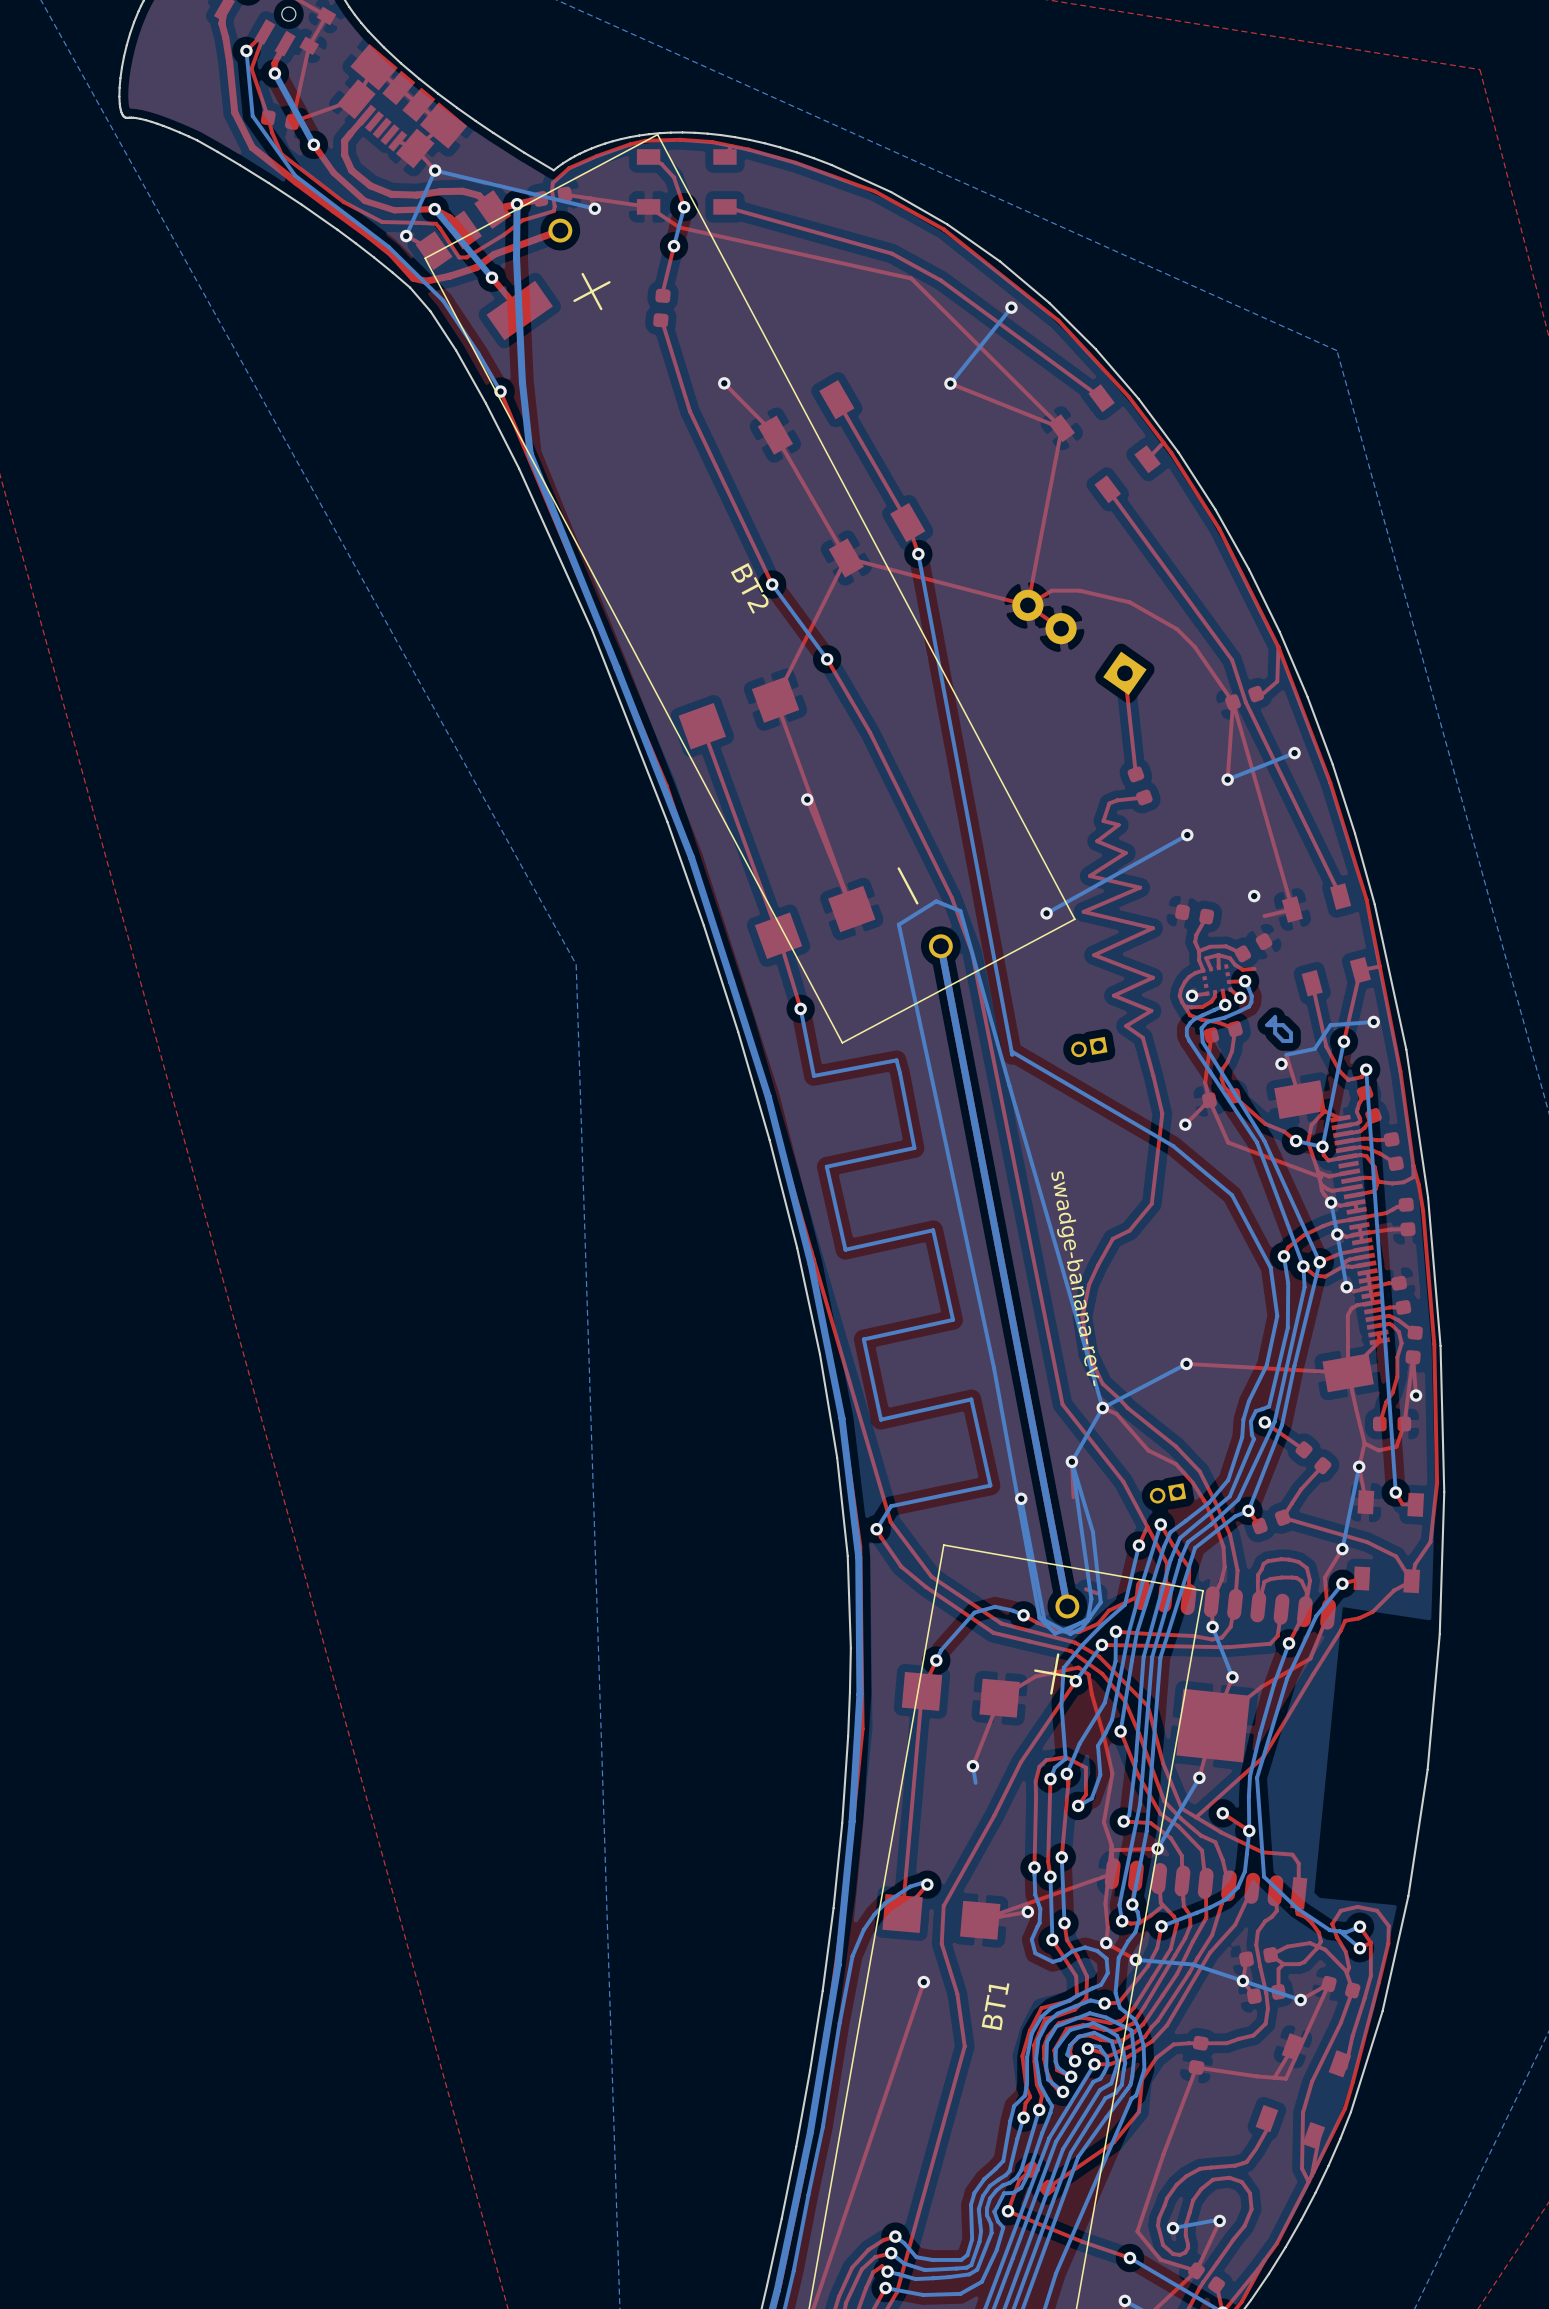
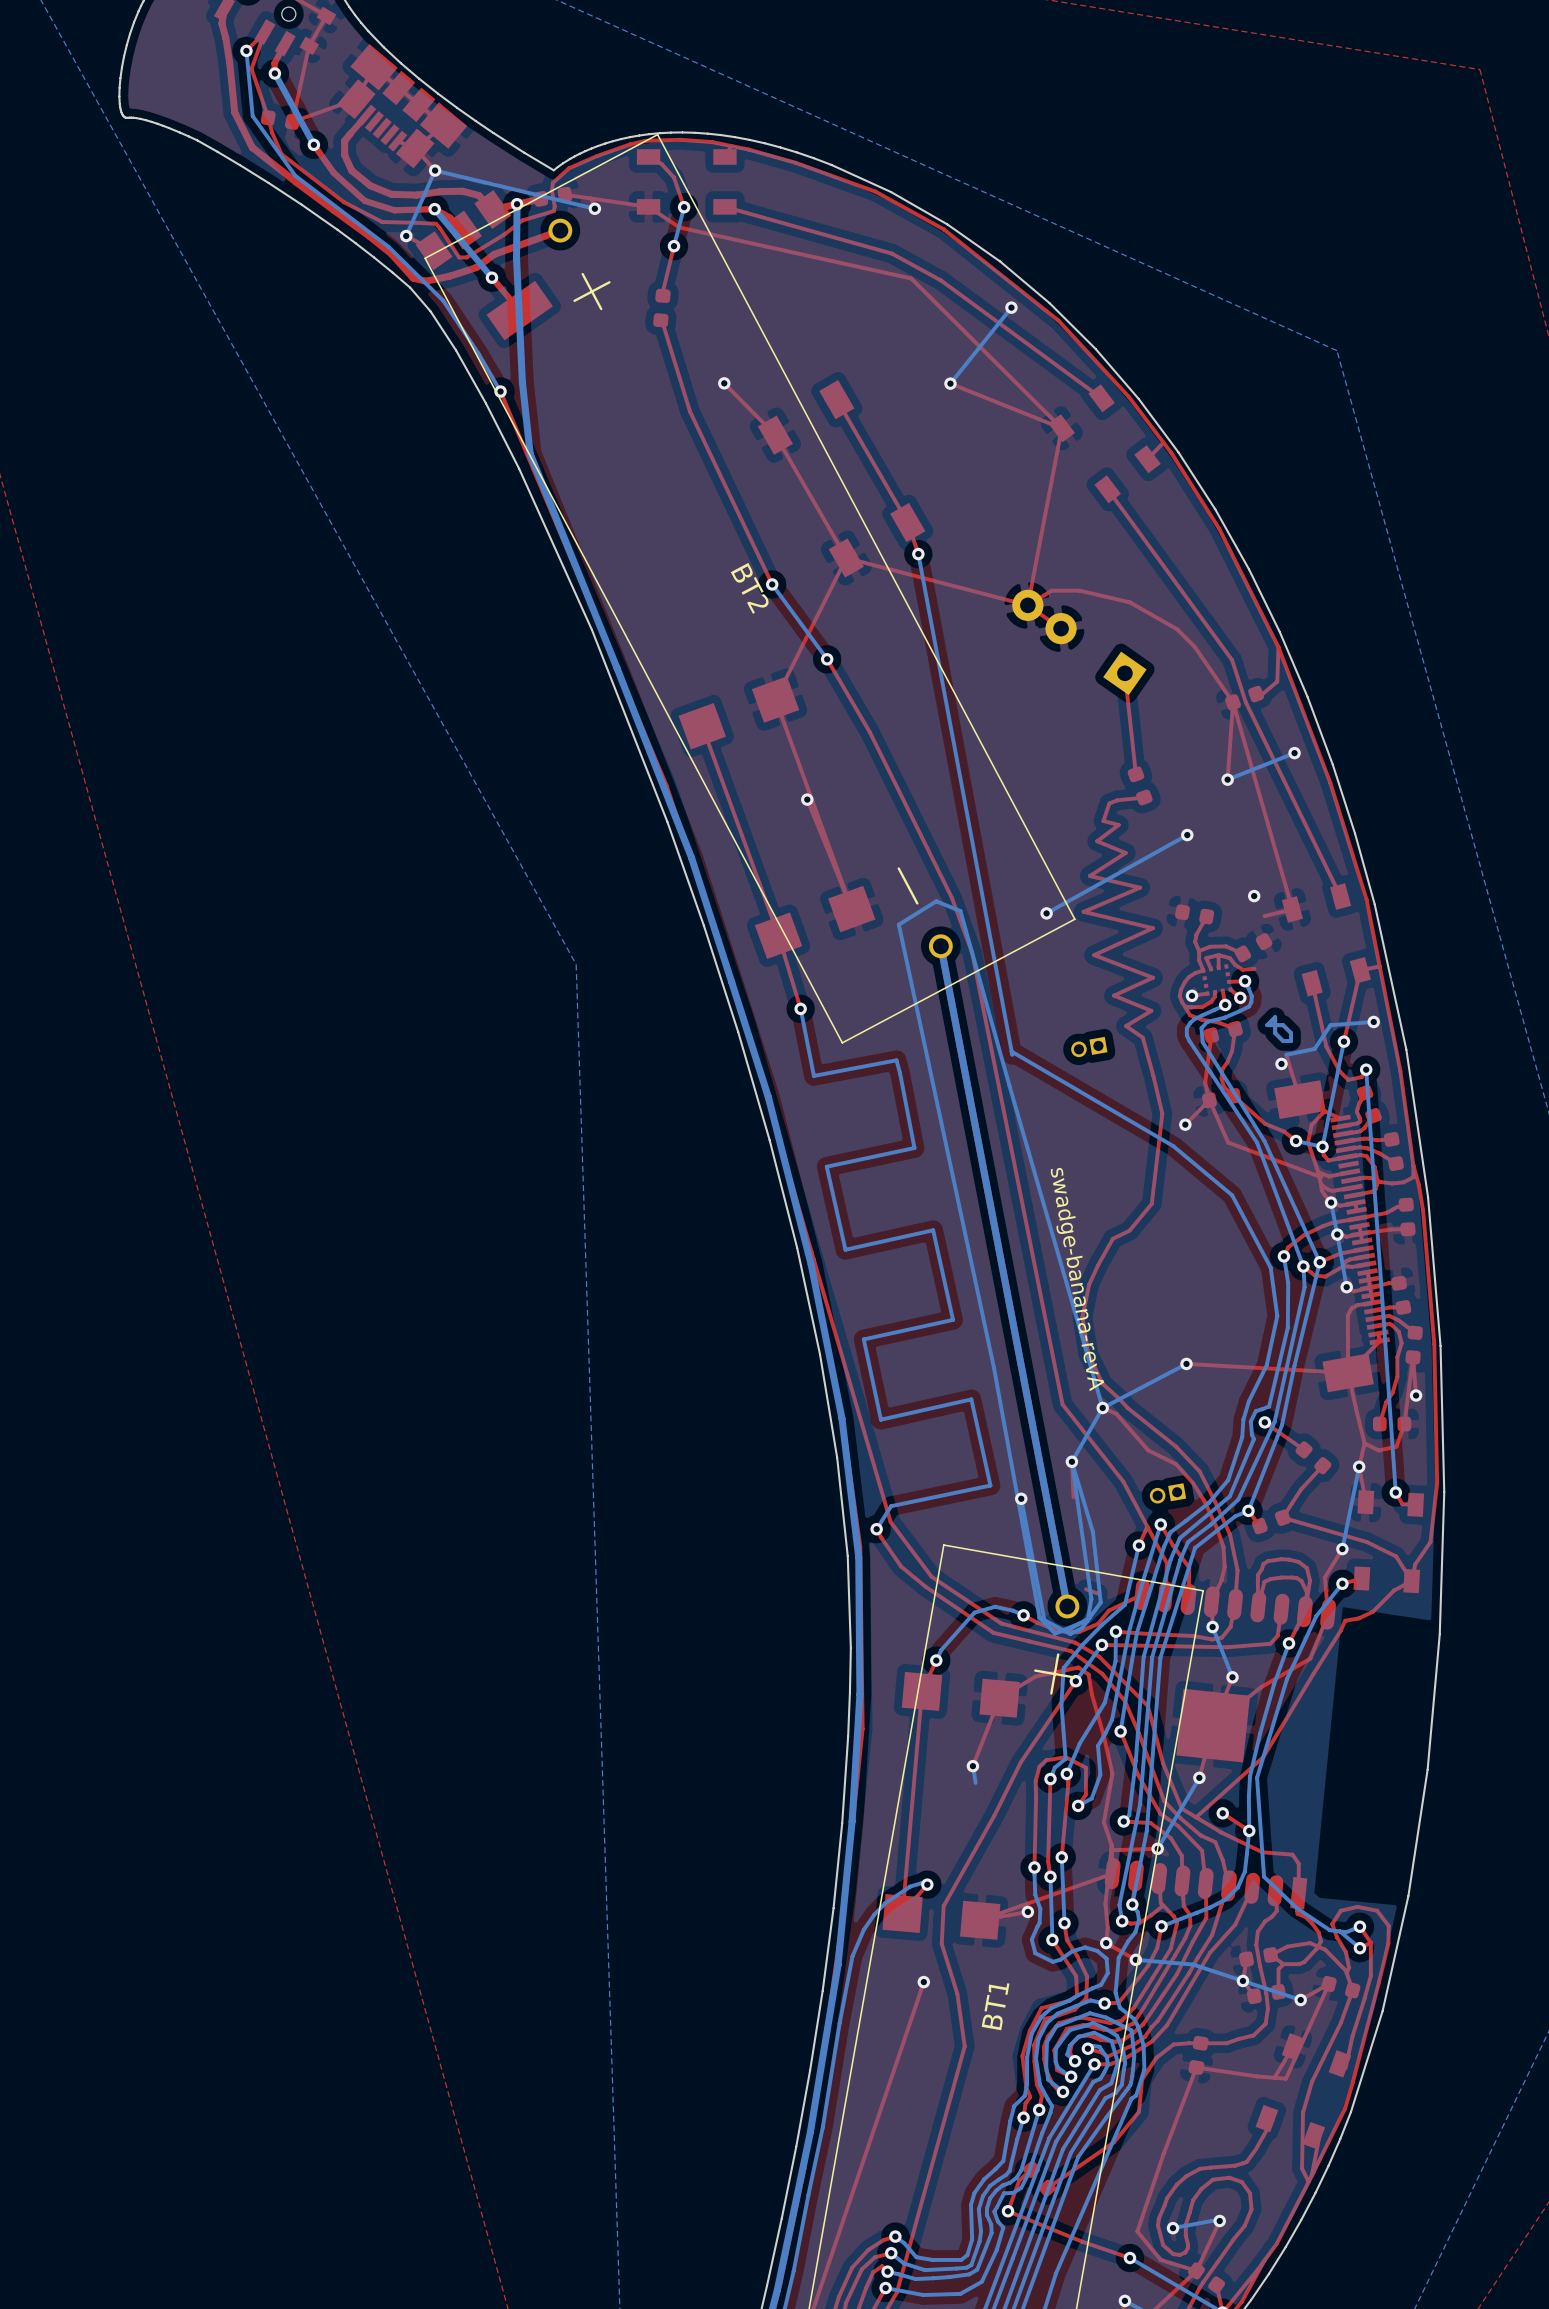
text: swadge-banana-rev- (1075, 1278) -> swadge-banana-revA (1077, 1279)

